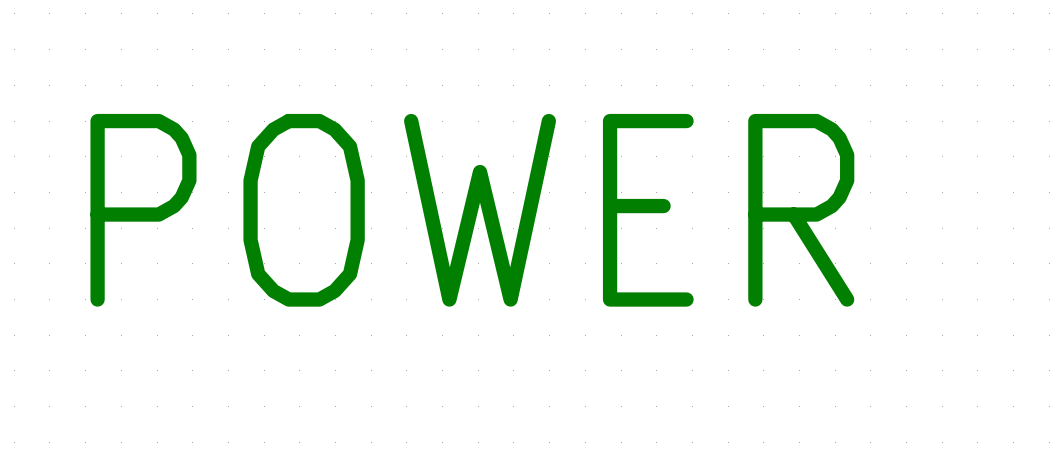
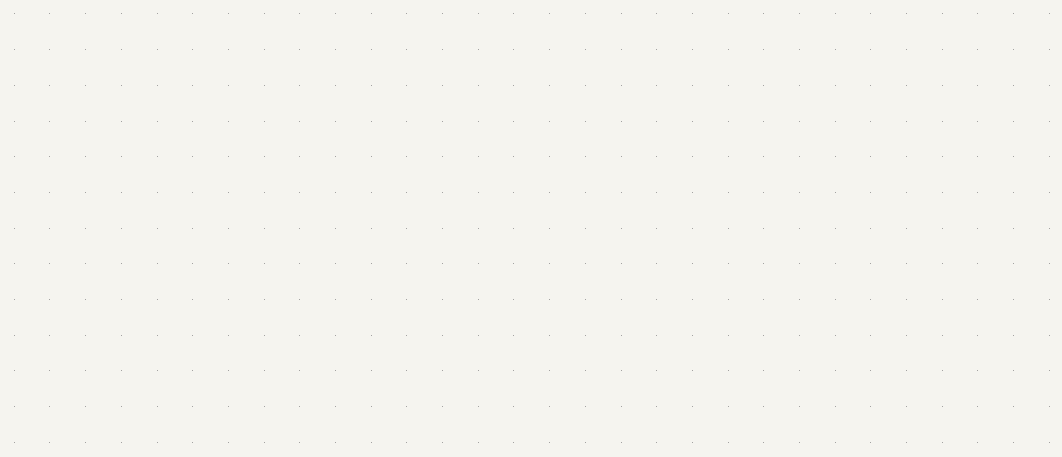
text: POWER (472, 210) -> none

